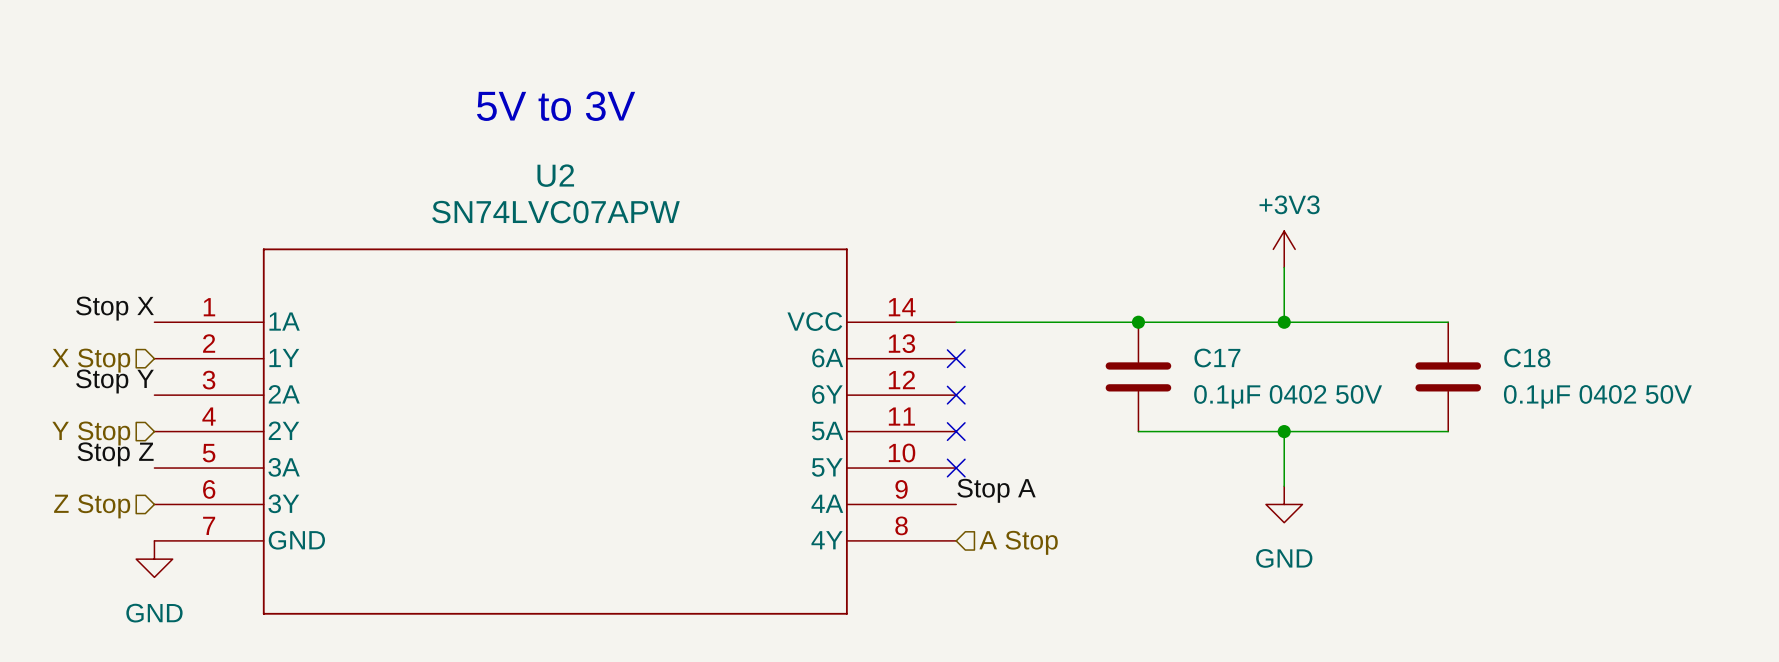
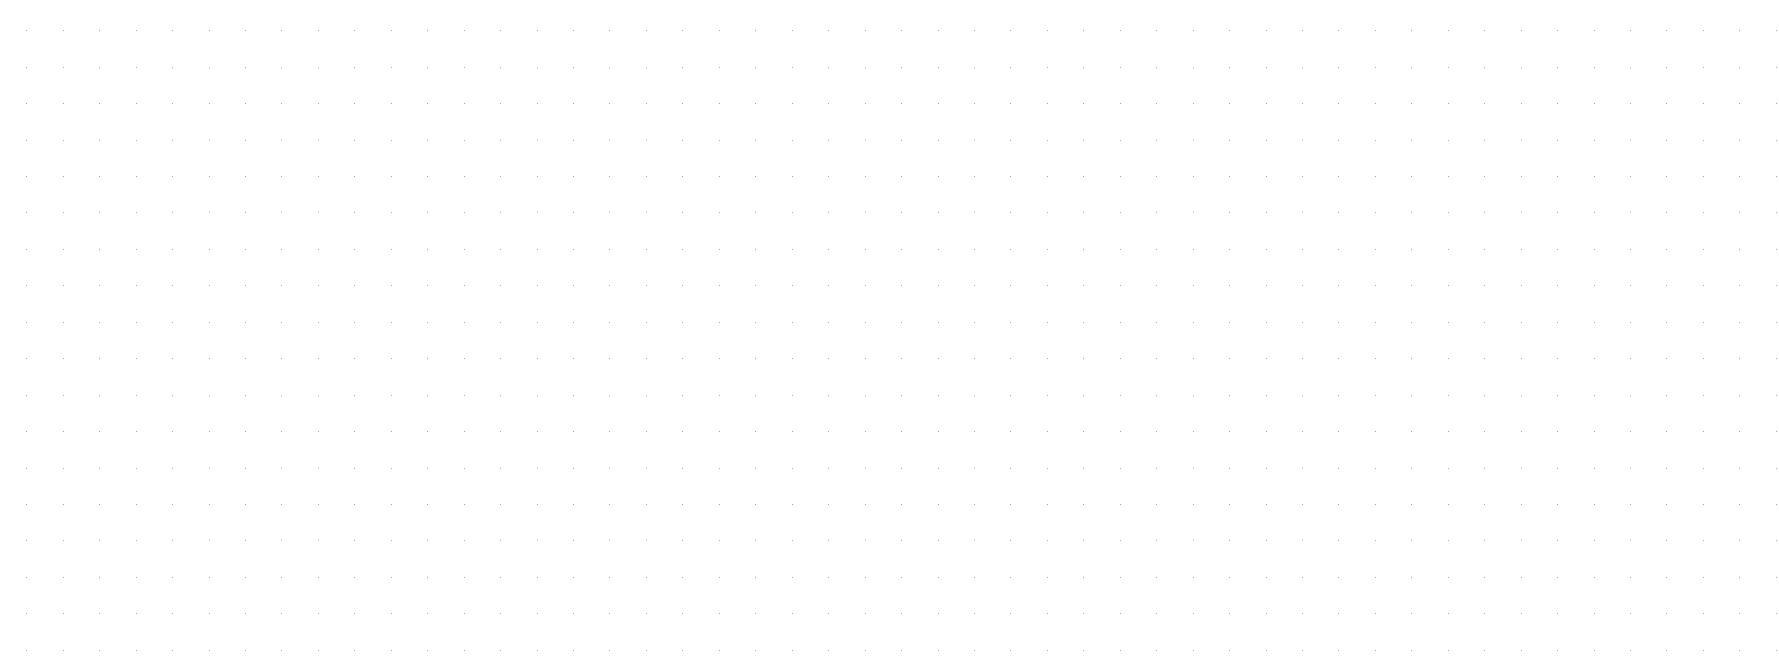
text: 5V to 3V (556, 106) -> none
power symbol: +3V3 (1284, 249) -> none
wire: (1284, 267) (1284, 322) -> none
label: Stop X (115, 308) -> none
wire: (956, 322) (1448, 322) -> none
junction: (1138, 322) -> none
junction: (1284, 322) -> none
no-connect mark: (956, 358) -> none
hierarchical label: X Stop (91, 360) -> none
C17: 0.1μF 0402 50V (1138, 376) -> none
C18: 0.1μF 0402 50V (1448, 376) -> none
label: Stop Y (114, 381) -> none
no-connect mark: (956, 395) -> none
U2: SN74LVC07APW (555, 431) -> none
no-connect mark: (956, 431) -> none
wire: (1138, 431) (1448, 431) -> none
wire: (1284, 431) (1284, 486) -> none
junction: (1284, 431) -> none
hierarchical label: Y Stop (91, 433) -> none
label: Stop Z (115, 454) -> none
no-connect mark: (956, 468) -> none
label: Stop A (996, 490) -> none
power symbol: GND (1284, 504) -> none
hierarchical label: Z Stop (92, 506) -> none
hierarchical label: A Stop (1018, 542) -> none
power symbol: GND (154, 559) -> none

